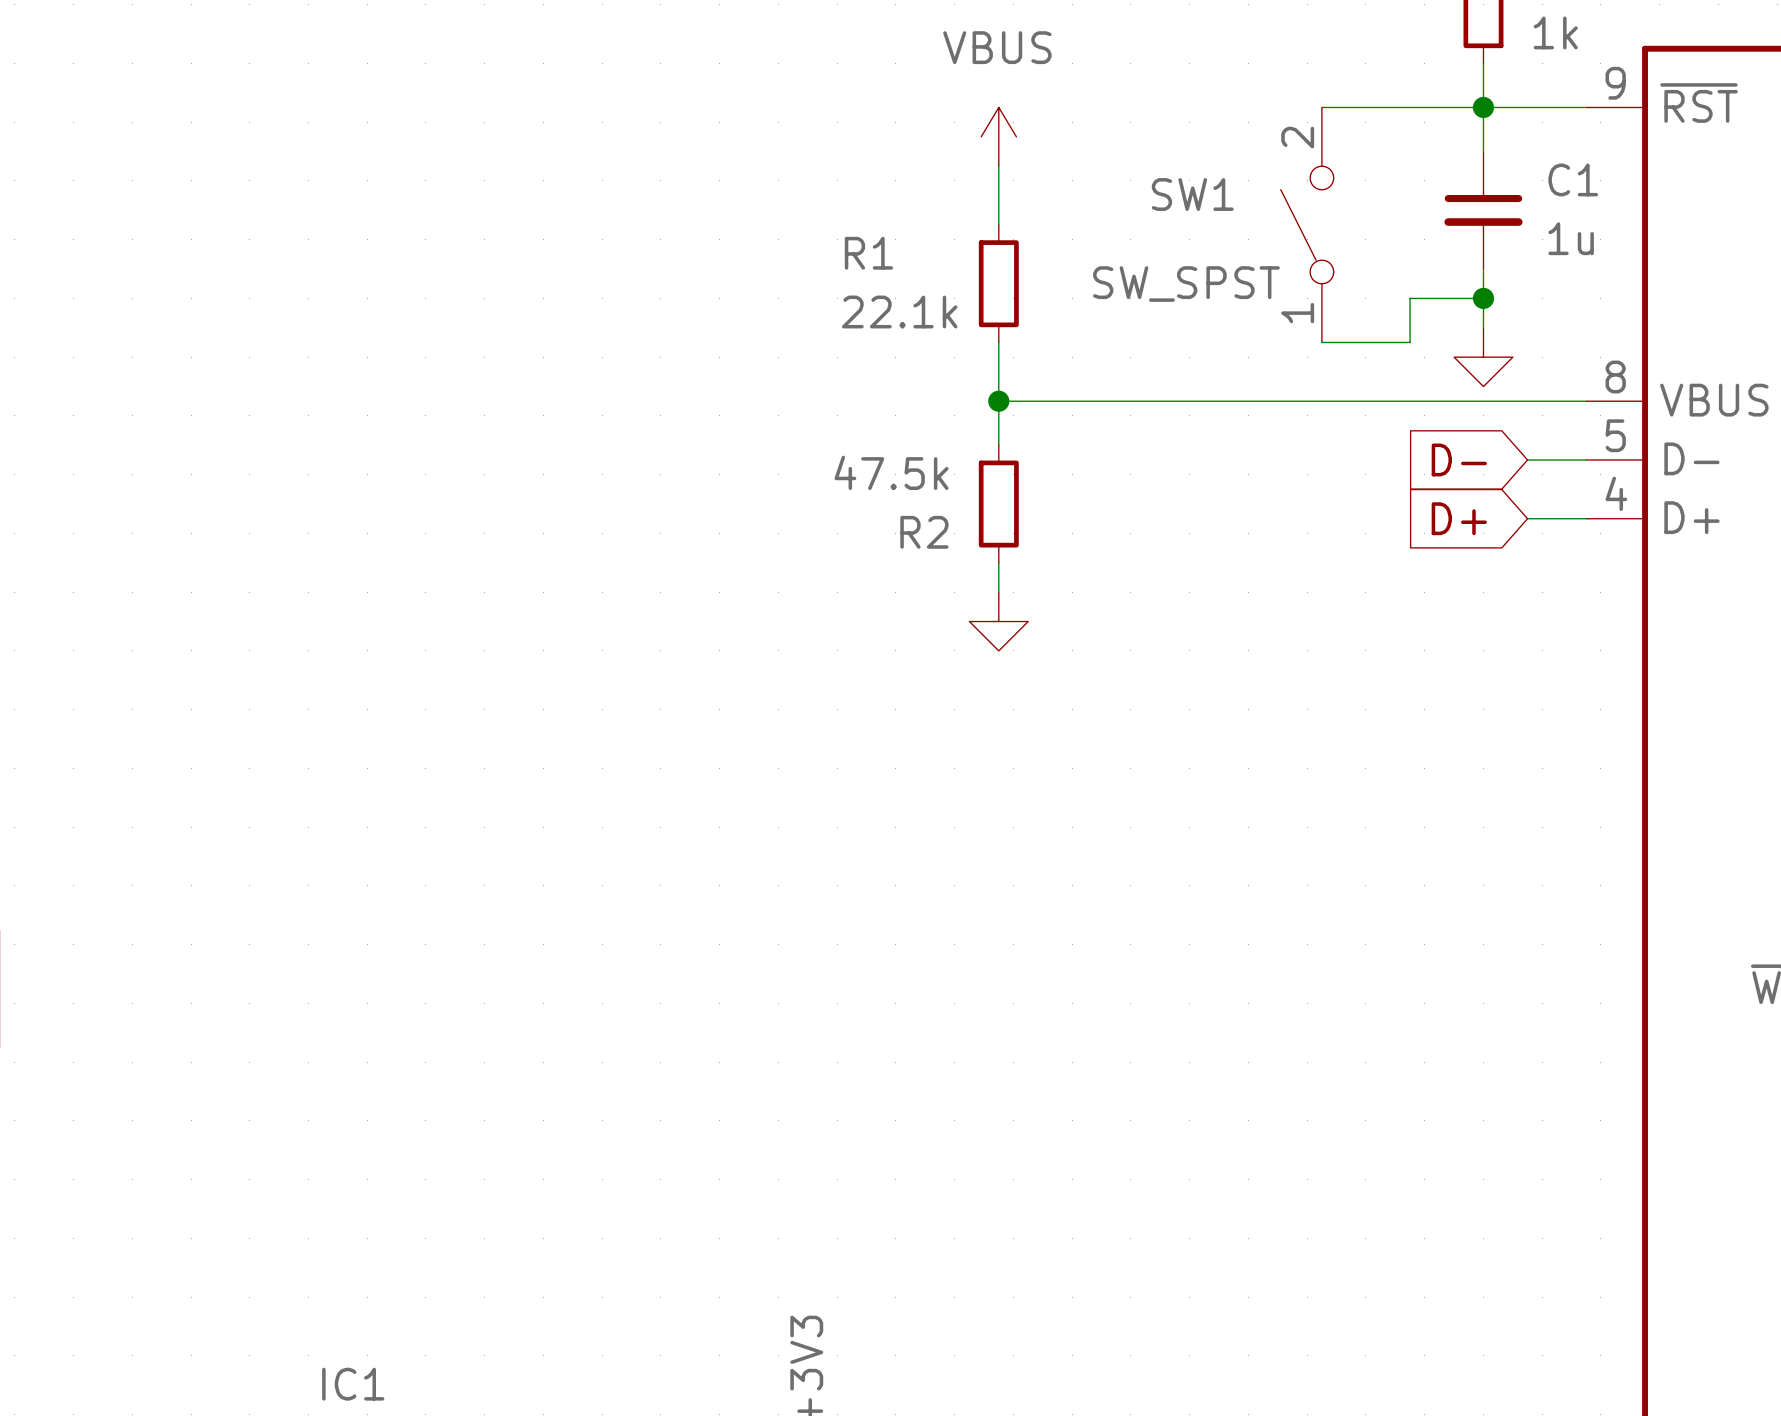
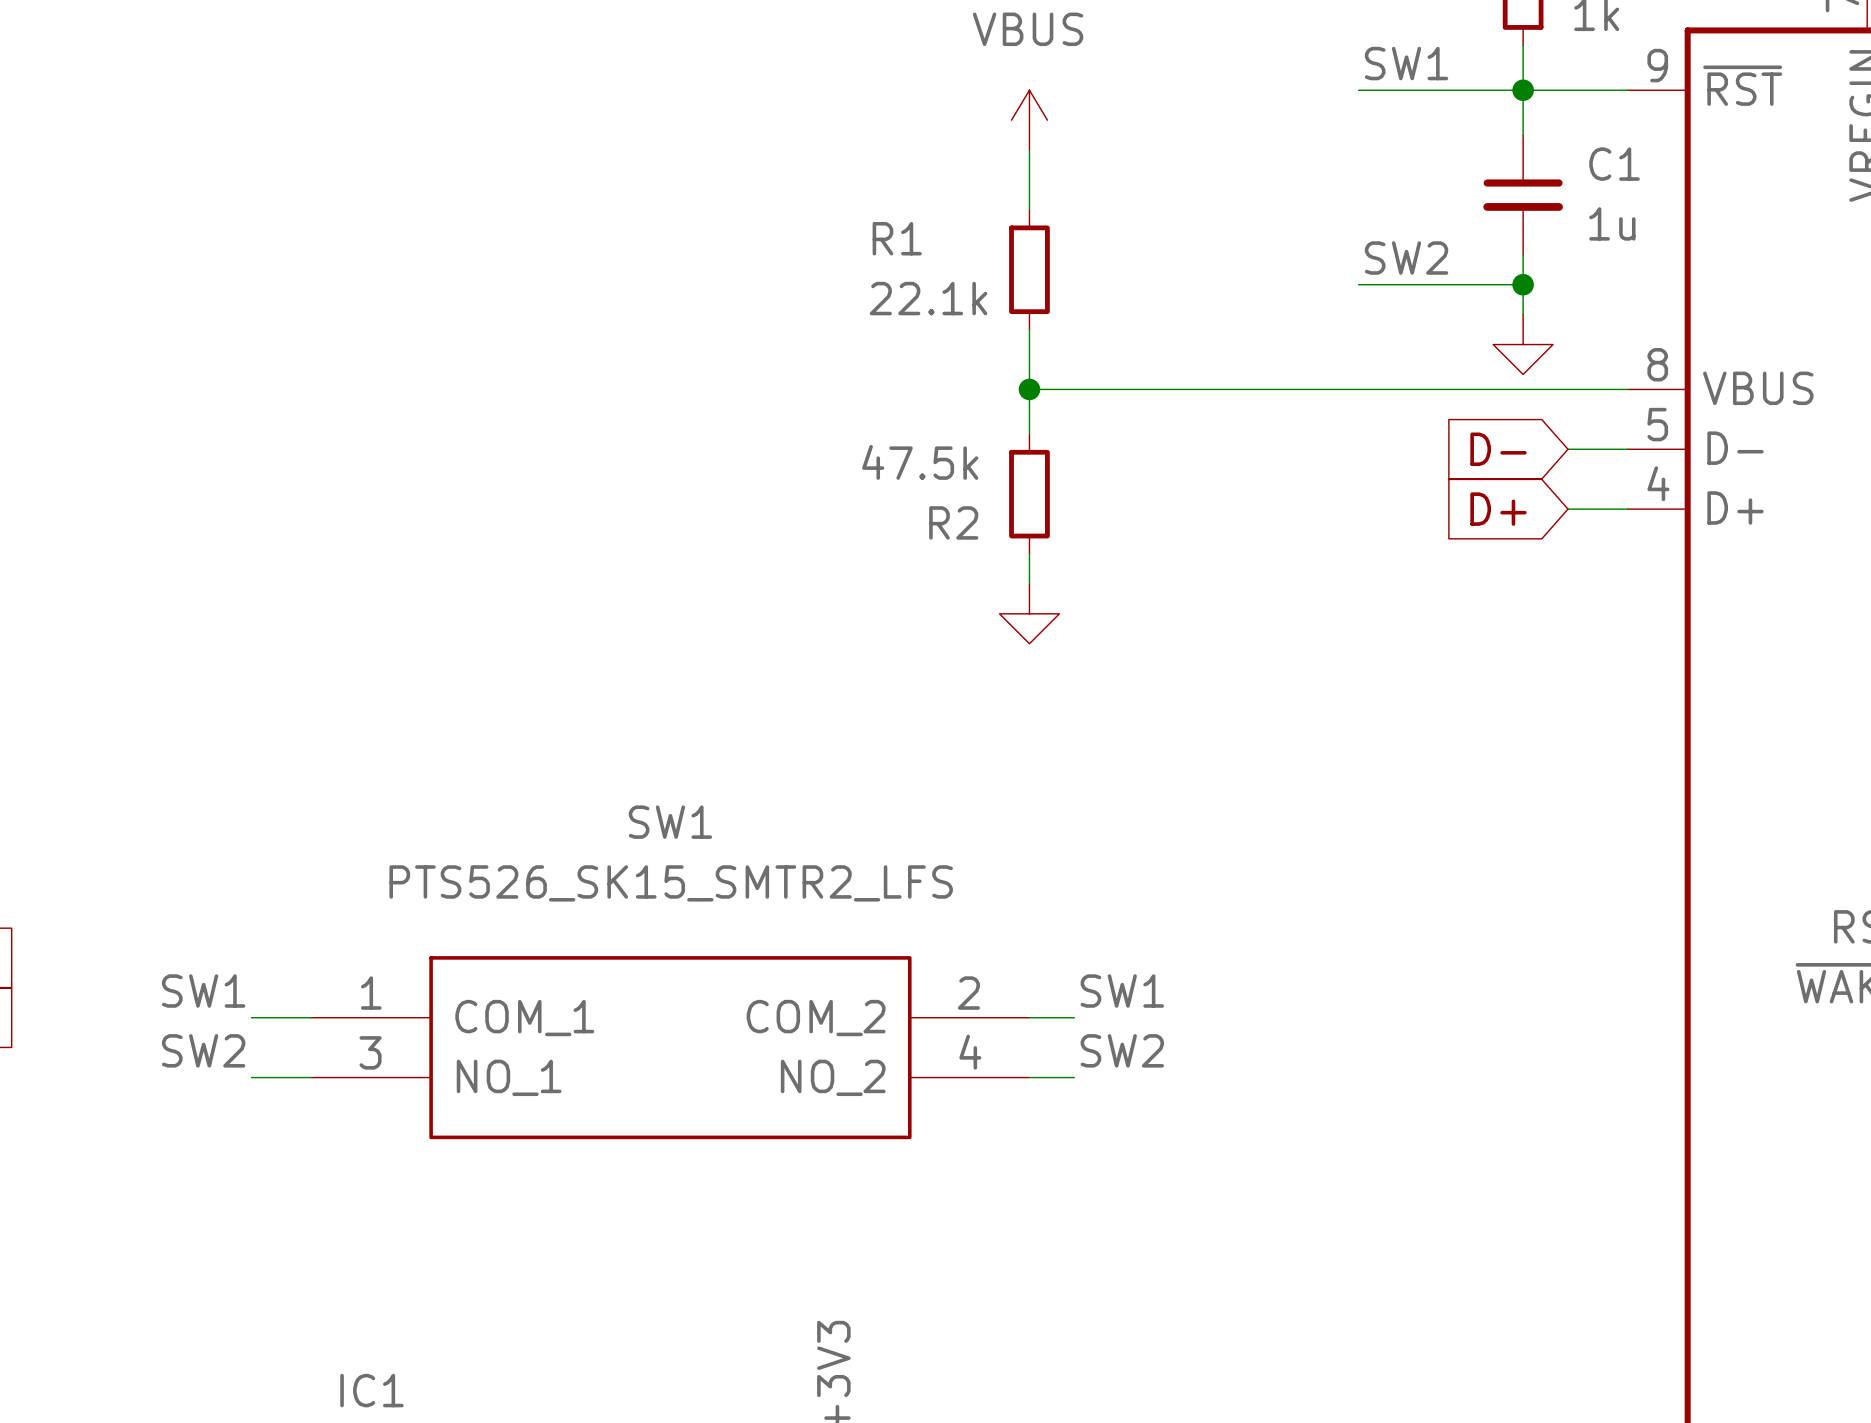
label: none -> SW1 (1406, 63)
SW1 symbol: [1280, 107, 1334, 343] -> [311, 956, 1030, 1140]
SW1 name position: SW1 (1192, 194) -> SW1 (670, 822)
label: none -> SW2 (1406, 258)
SW1 value: SW_SPST (1186, 284) -> PTS526_SK15_SMTR2_LFS (671, 883)
wire: (1410, 298) (1410, 342) (1321, 342) -> (1448, 284) (1358, 284)
label: none -> SW1 (203, 991)
label: none -> SW1 (1122, 991)
wire: none -> (251, 1017) (311, 1017)
wire: none -> (1029, 1017) (1074, 1017)
label: none -> SW2 (203, 1050)
label: none -> SW2 (1122, 1050)
wire: none -> (251, 1077) (311, 1077)
wire: none -> (1029, 1077) (1074, 1077)

